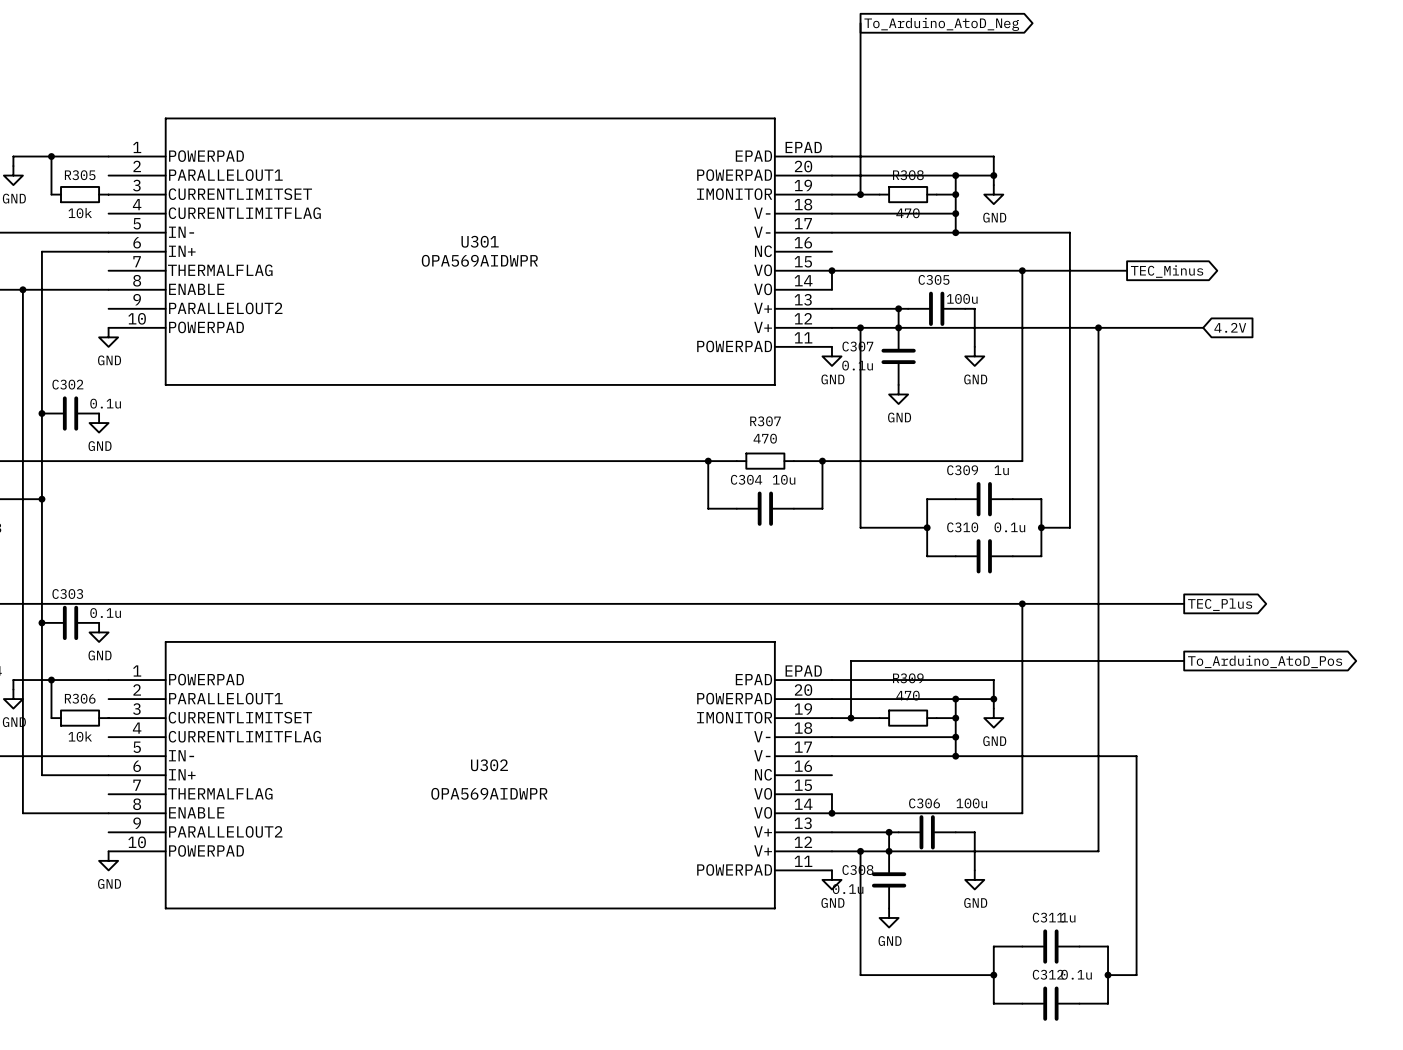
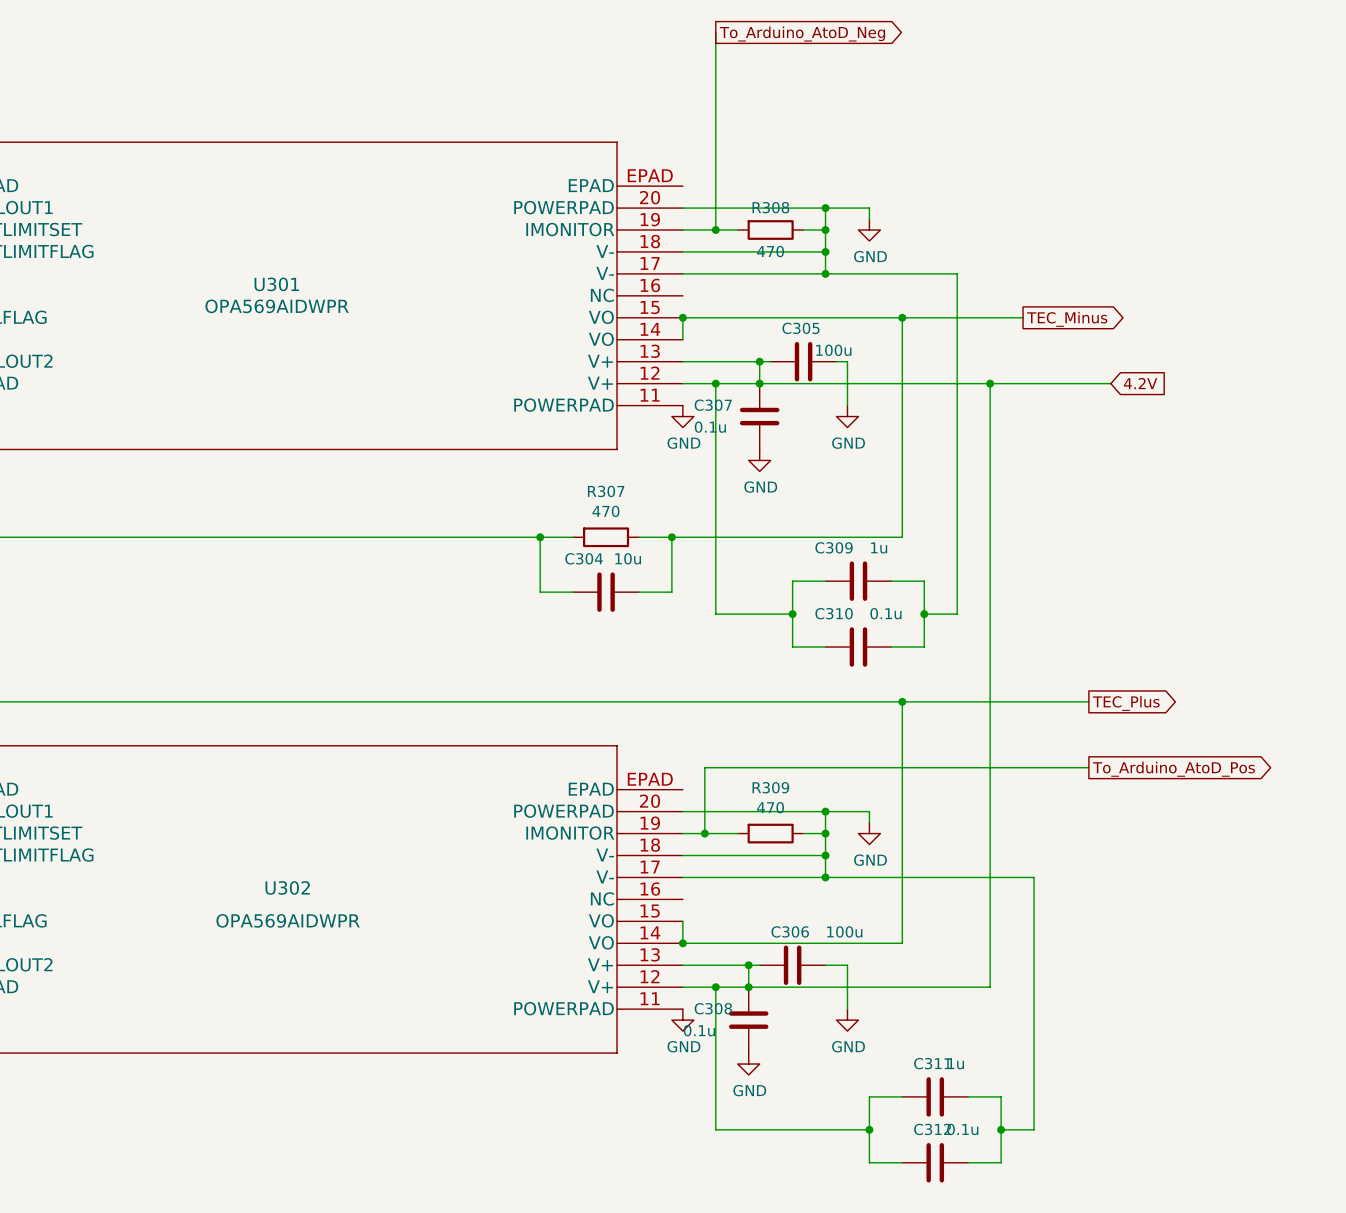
wire: (831, 156) (993, 156) (993, 175) -> none
junction: (993, 175) -> none
wire: (831, 680) (993, 680) (993, 699) -> none
junction: (993, 699) -> none

